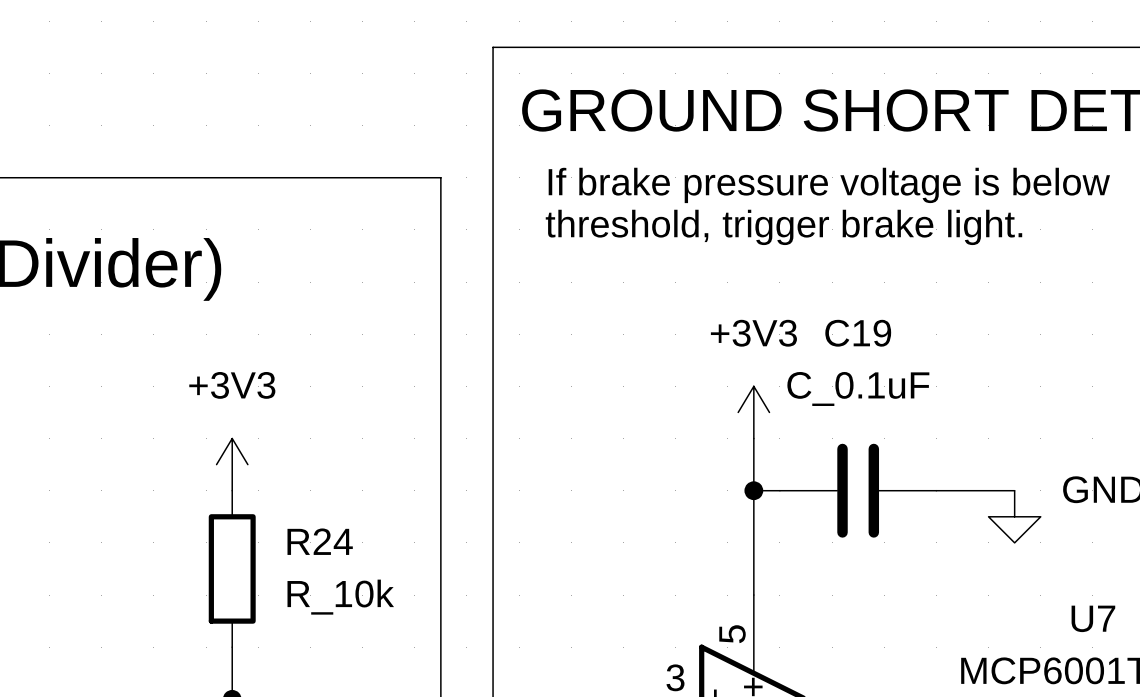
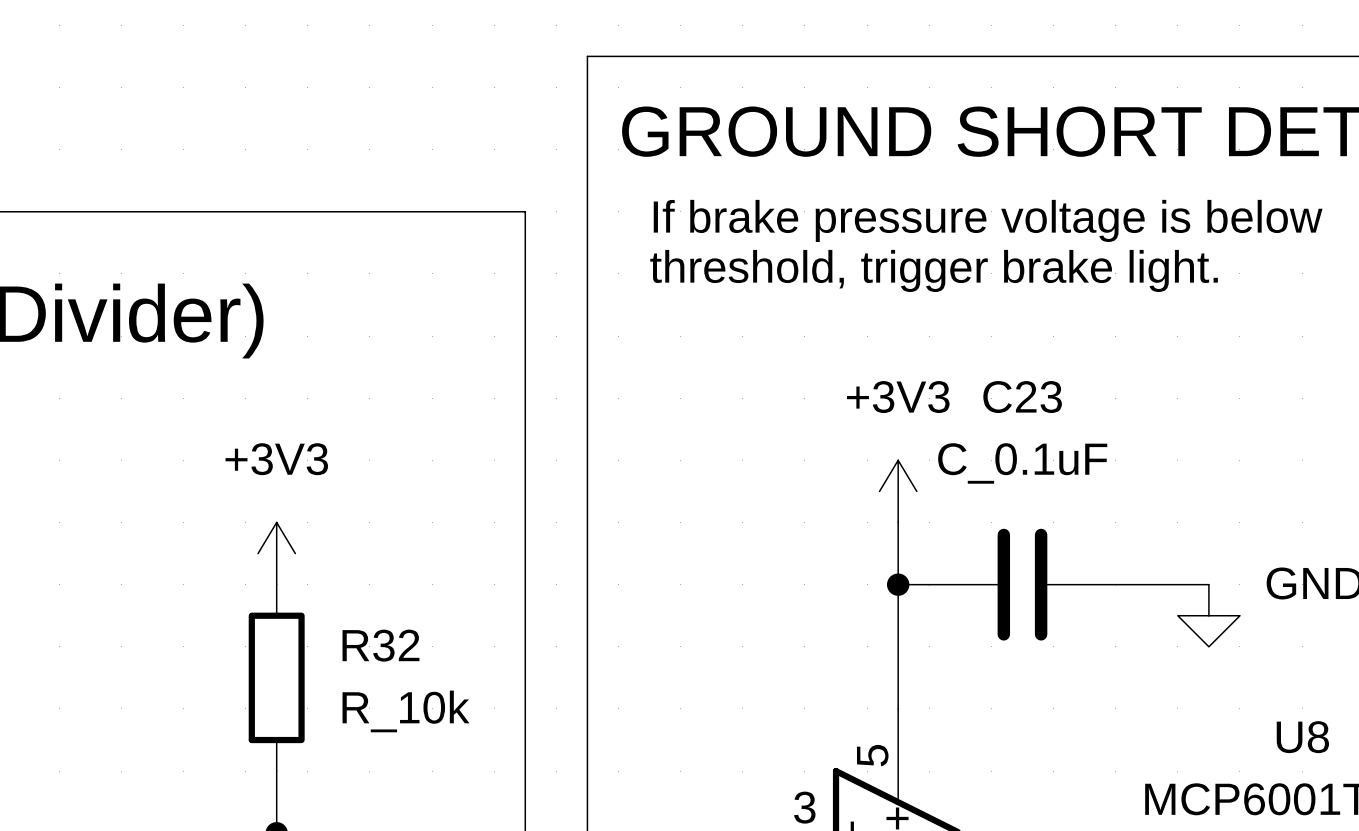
C19 name: C19 (858, 333) -> C23 (1022, 397)
R24 name: R24 (320, 541) -> R32 (380, 645)
U7 name: U7 (1093, 618) -> U8 (1302, 737)

